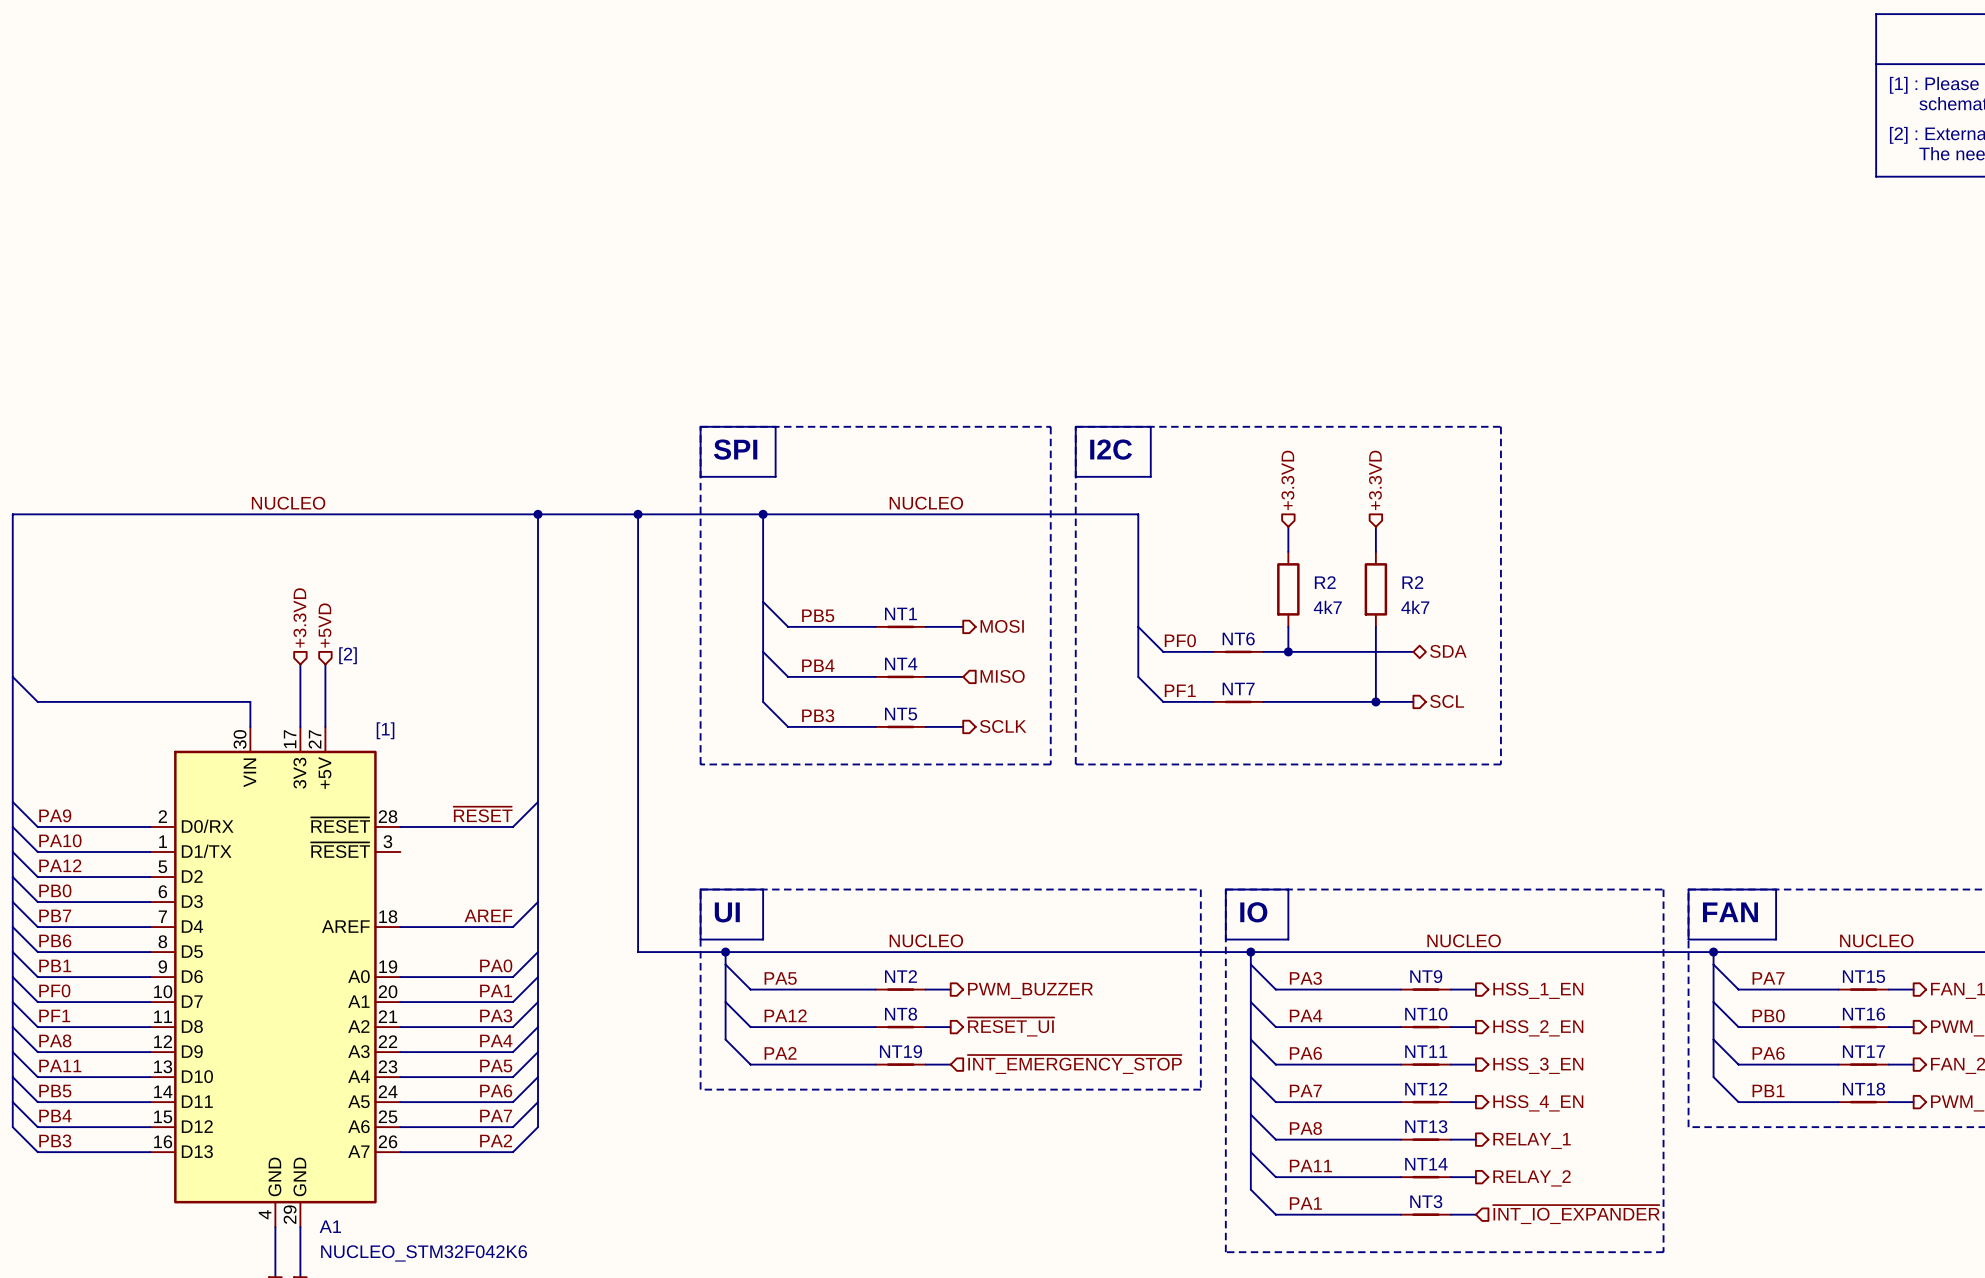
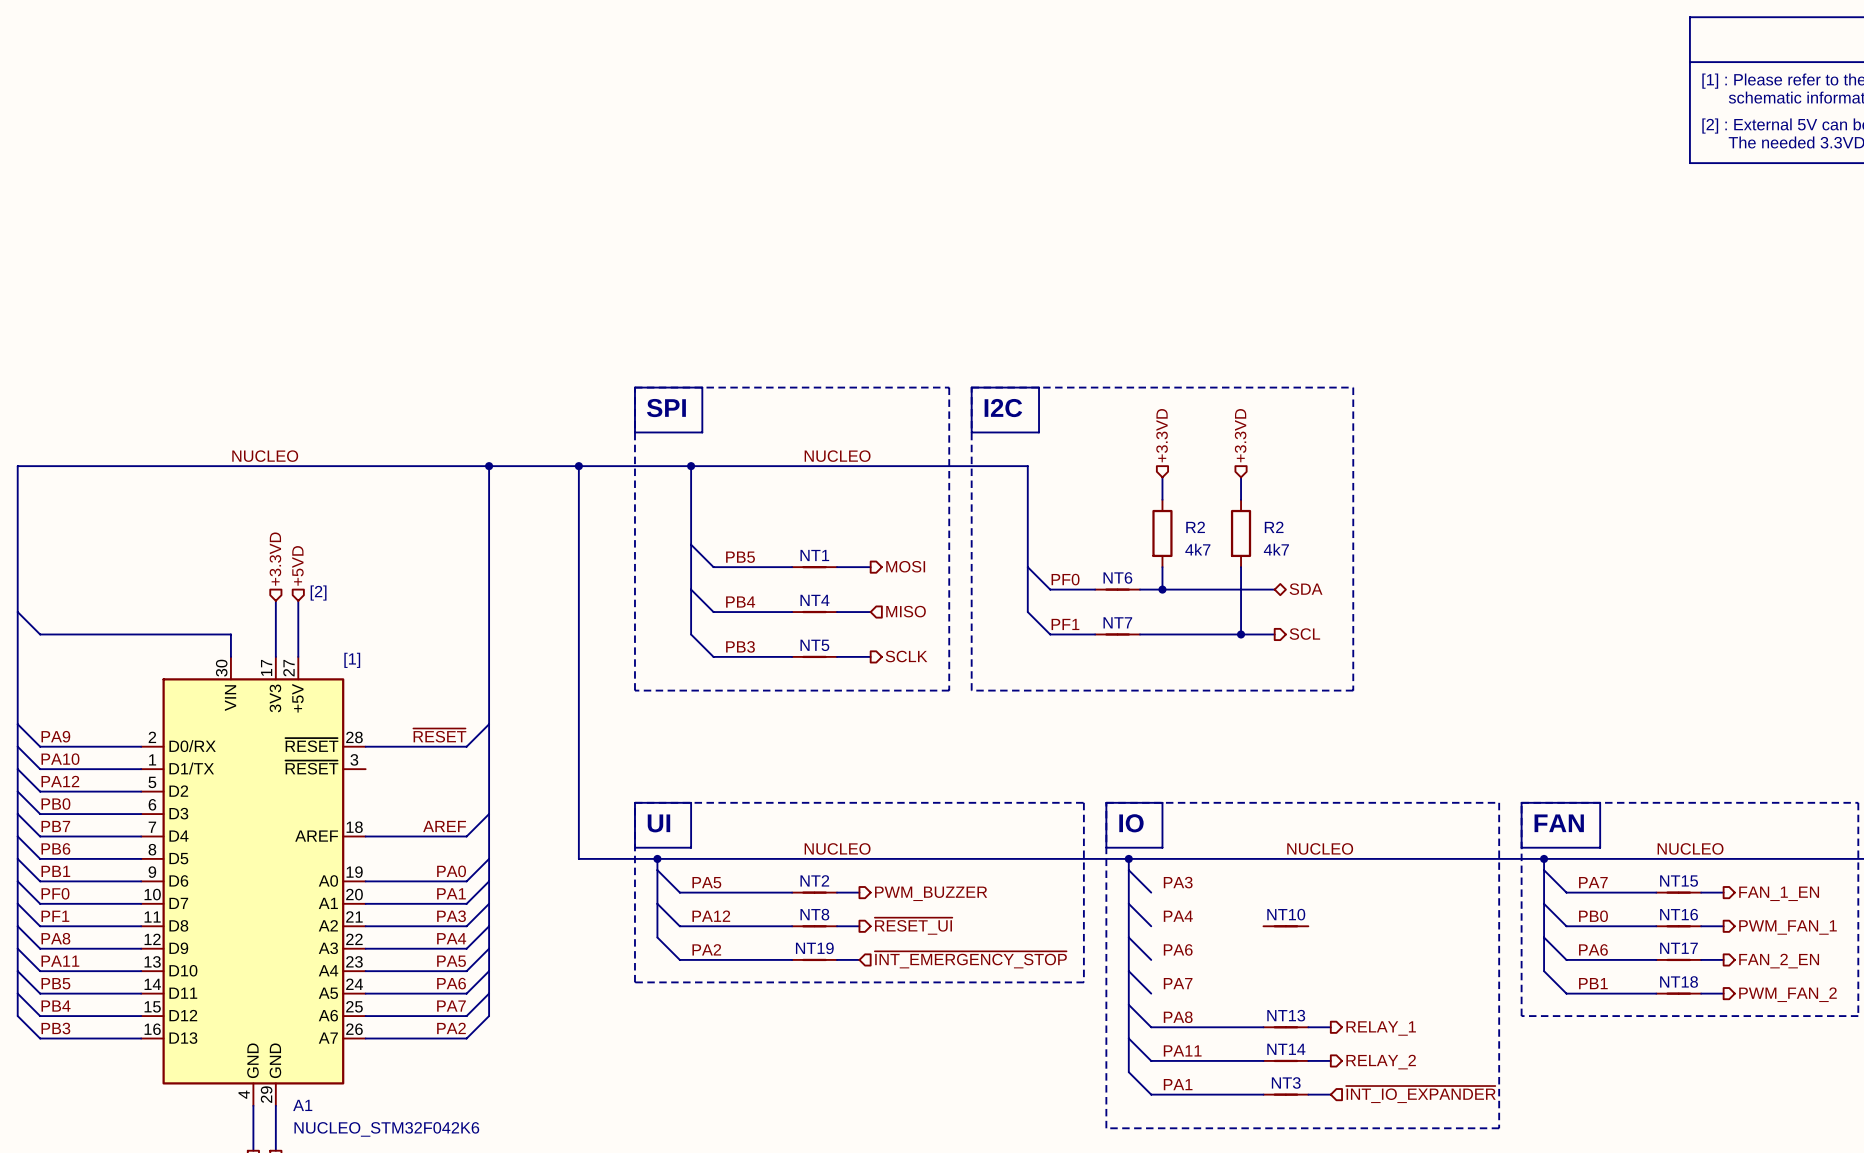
wire: (1275, 989) (1400, 989) -> none
NT9: (1425, 989) -> none
wire: (1450, 989) (1475, 989) -> none
hierarchical label: HSS_1_EN (1538, 990) -> none
wire: (1275, 1027) (1400, 1027) -> none
wire: (1450, 1027) (1475, 1027) -> none
hierarchical label: HSS_2_EN (1538, 1028) -> none
wire: (1275, 1064) (1400, 1064) -> none
NT11: (1425, 1064) -> none
wire: (1450, 1064) (1475, 1064) -> none
hierarchical label: HSS_3_EN (1538, 1065) -> none
wire: (1275, 1102) (1400, 1102) -> none
NT12: (1425, 1102) -> none
wire: (1450, 1102) (1475, 1102) -> none
hierarchical label: HSS_4_EN (1538, 1103) -> none

